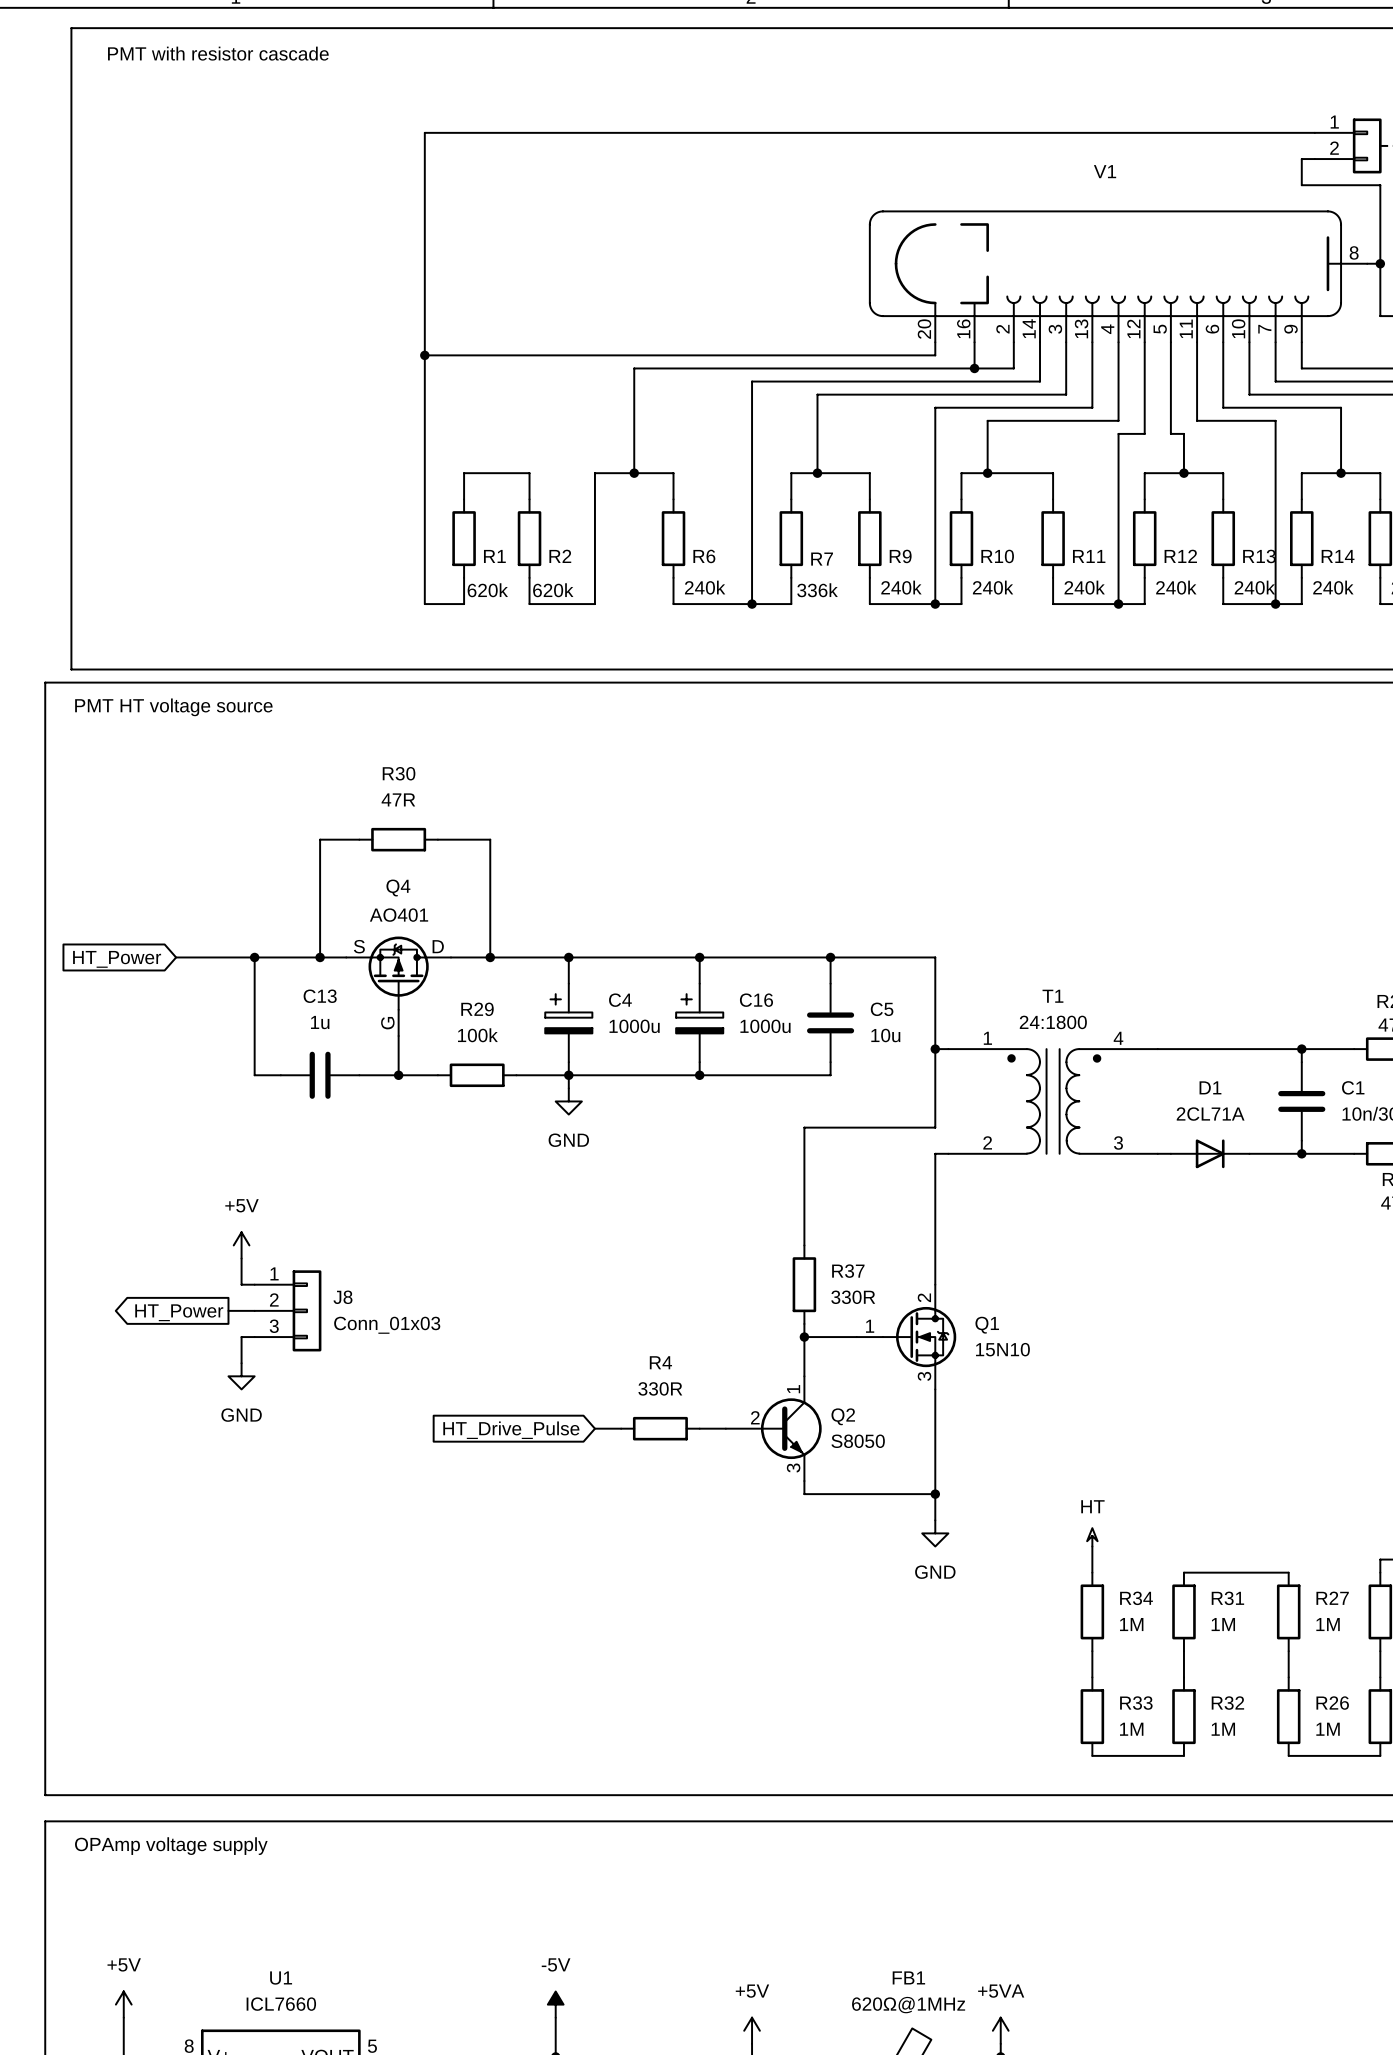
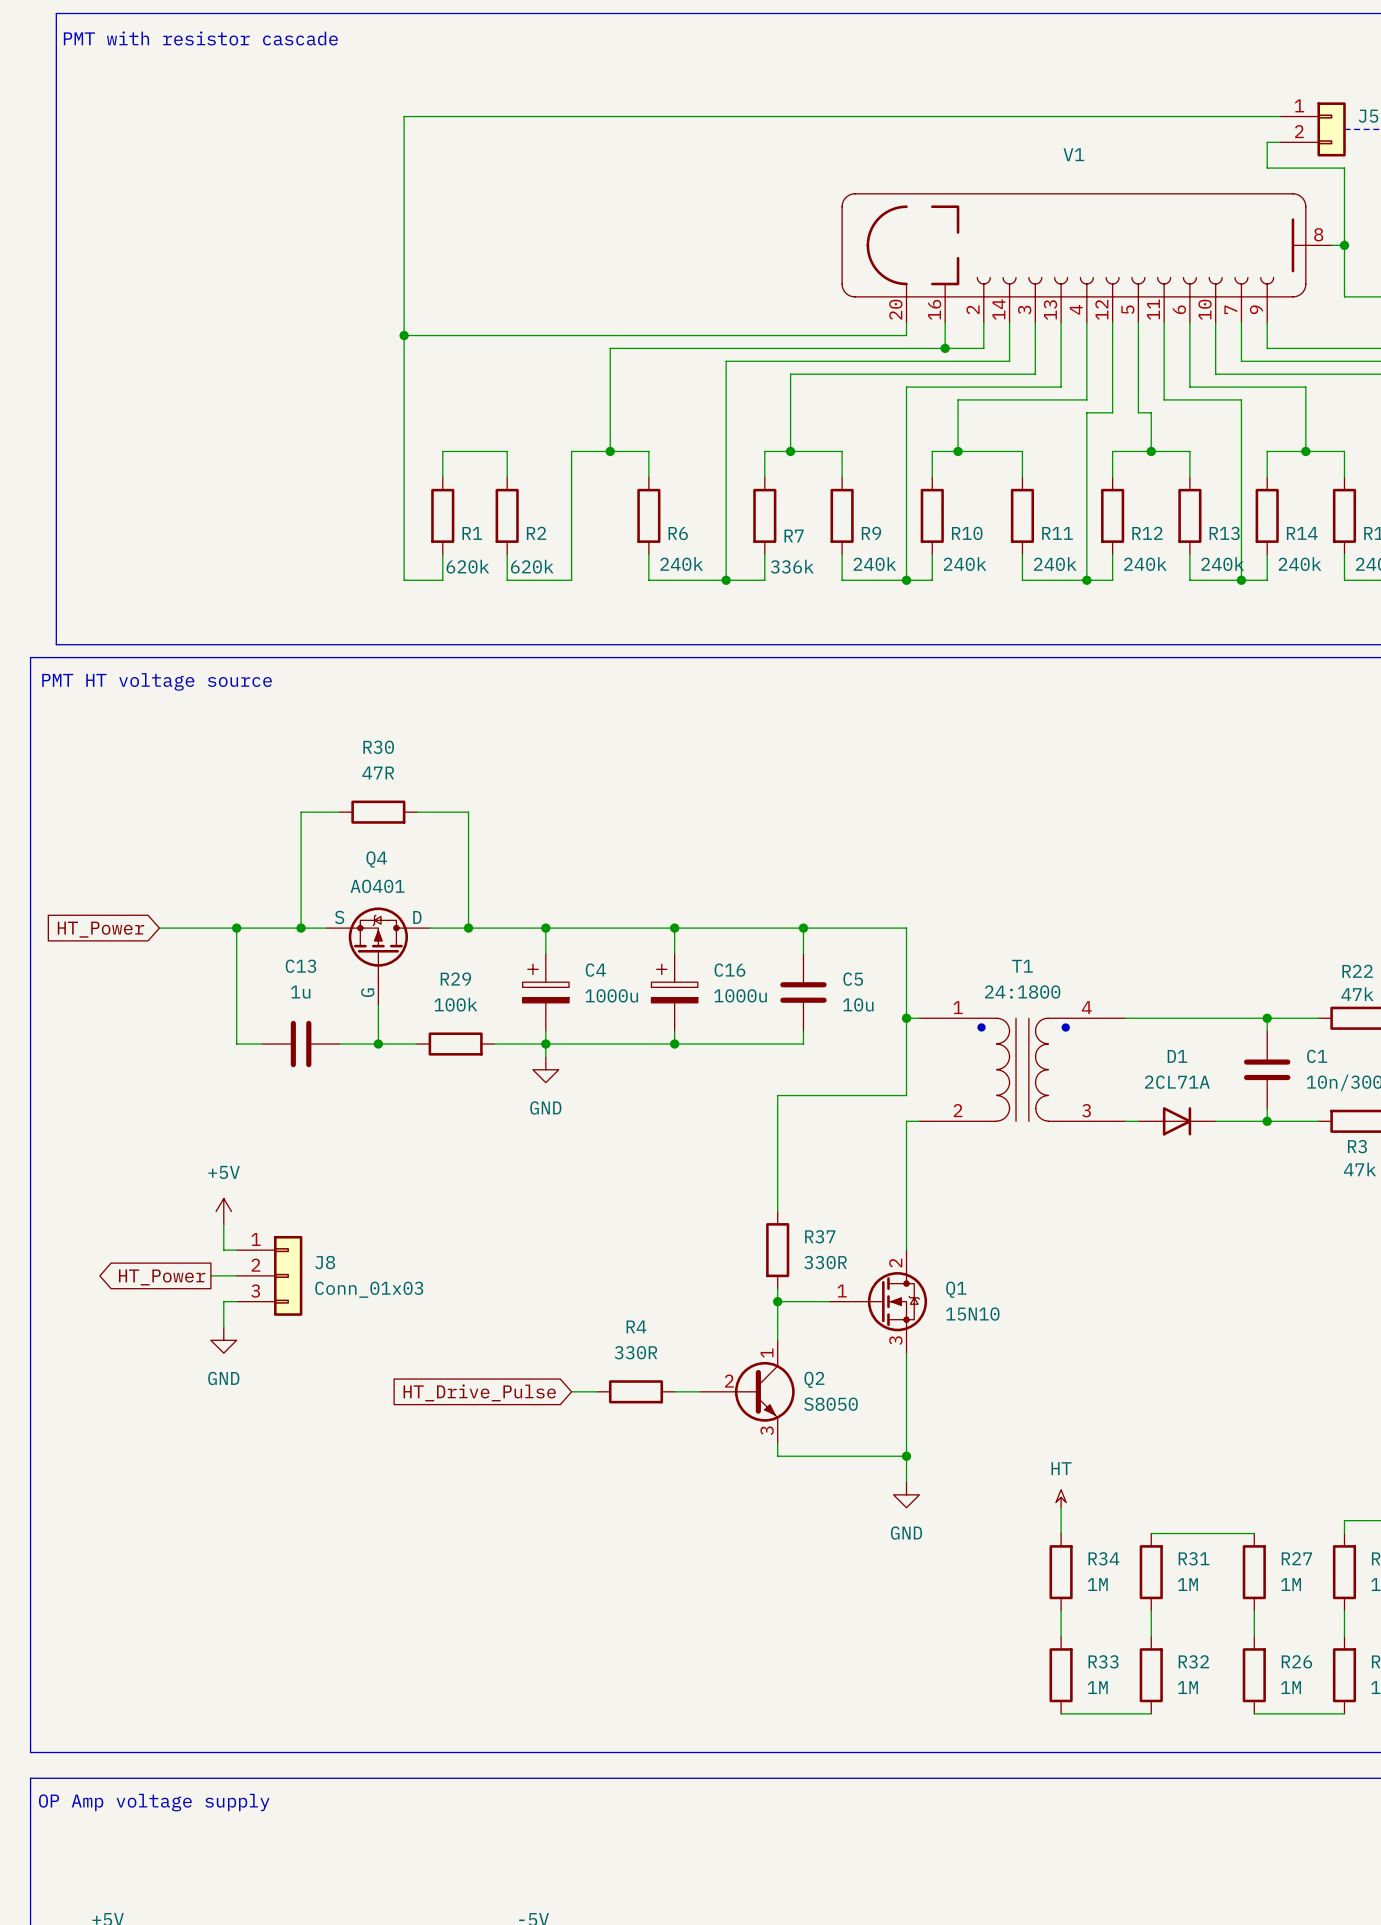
text: OPAmp voltage supply (171, 1846) -> OP Amp voltage supply (154, 1802)

